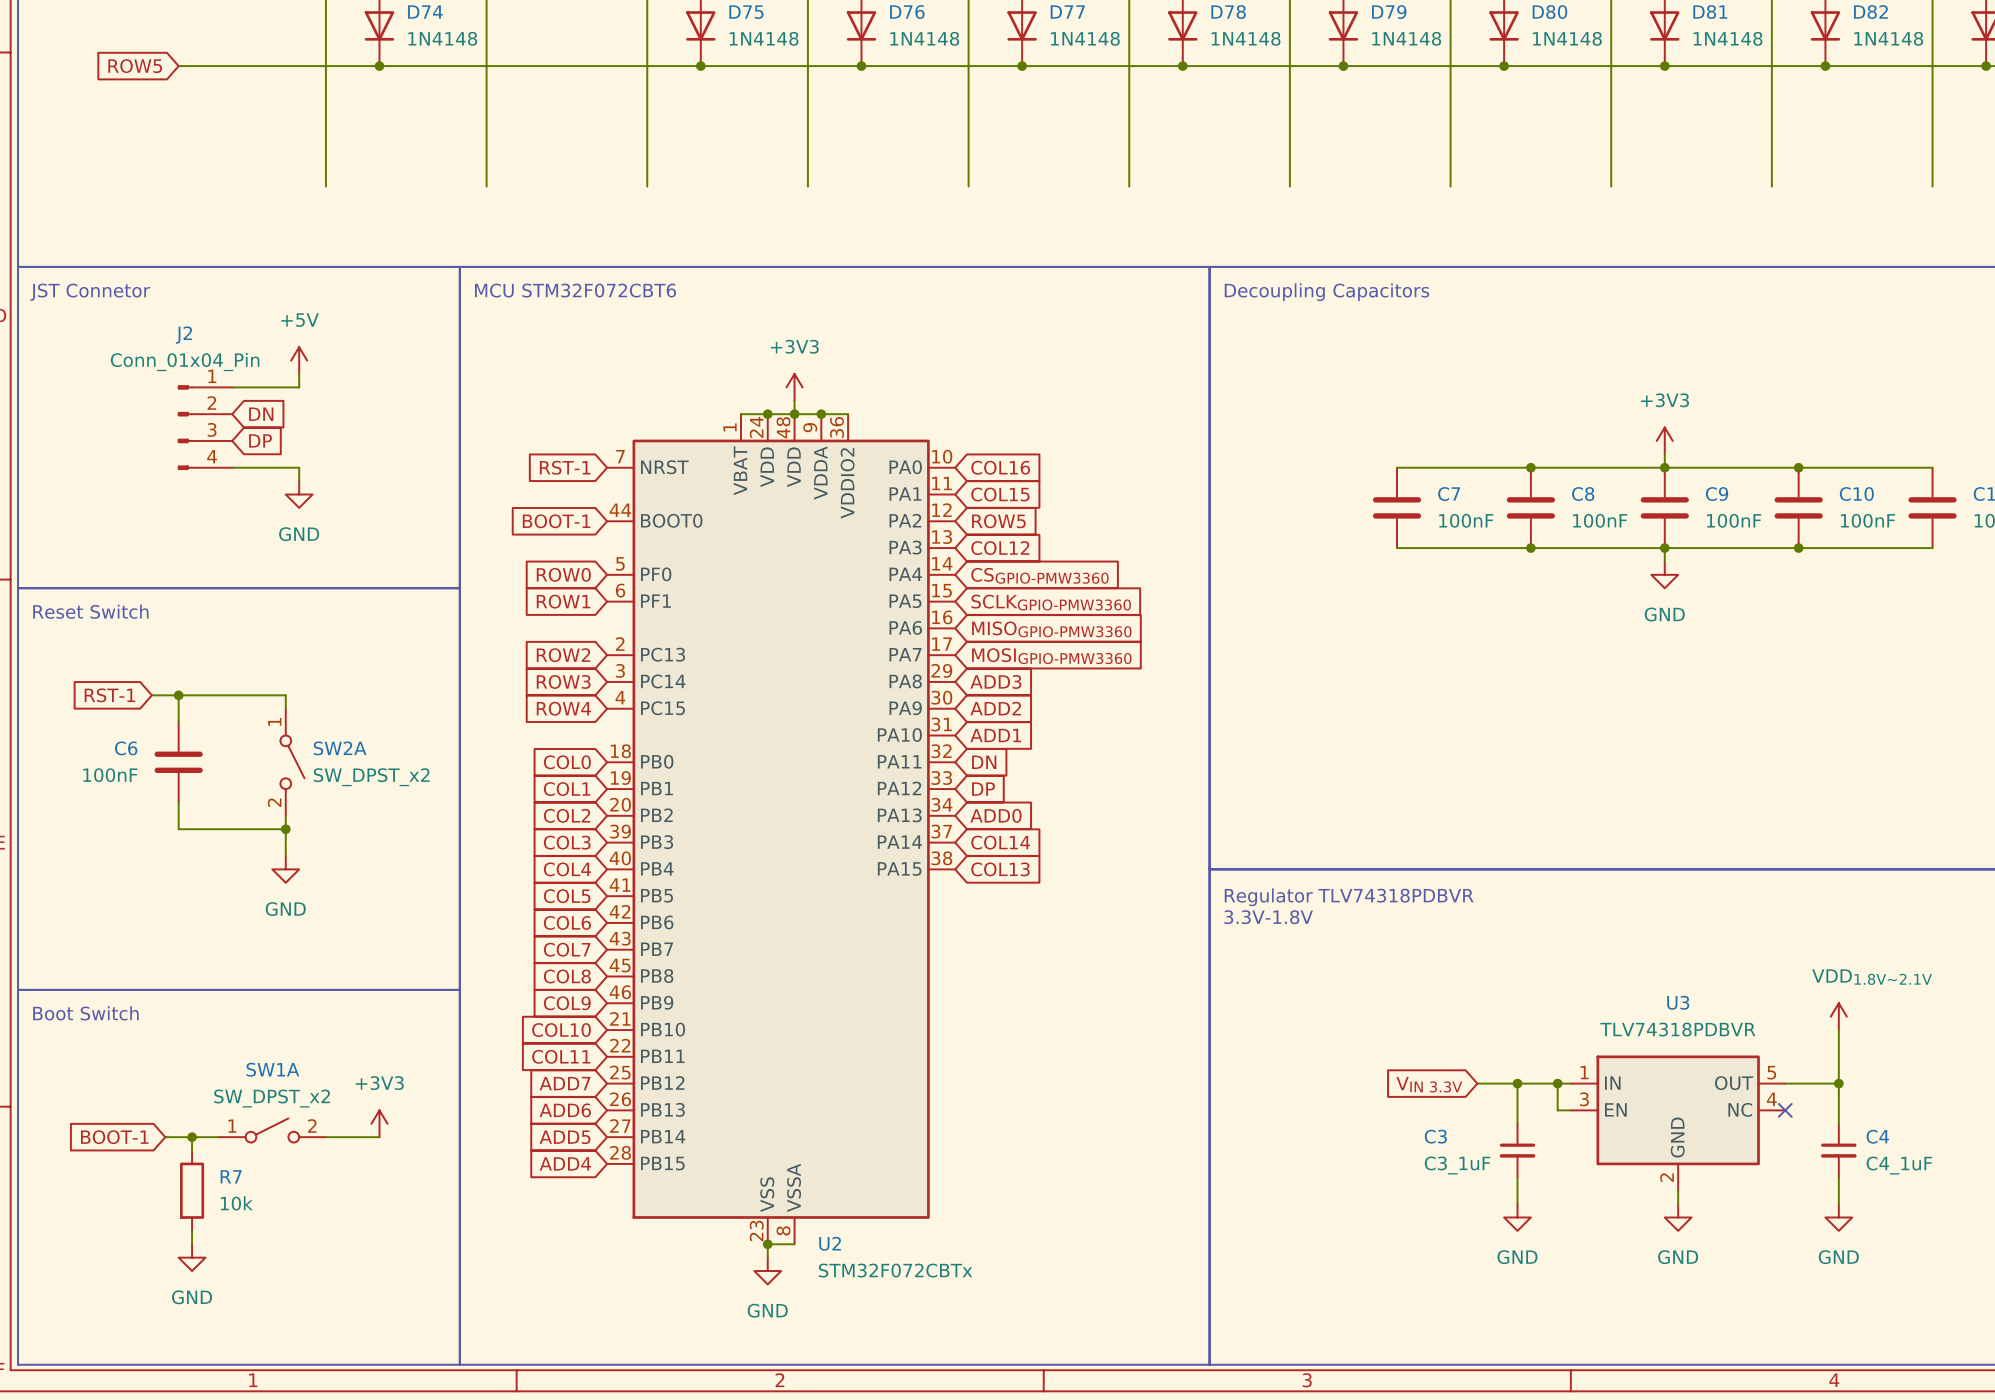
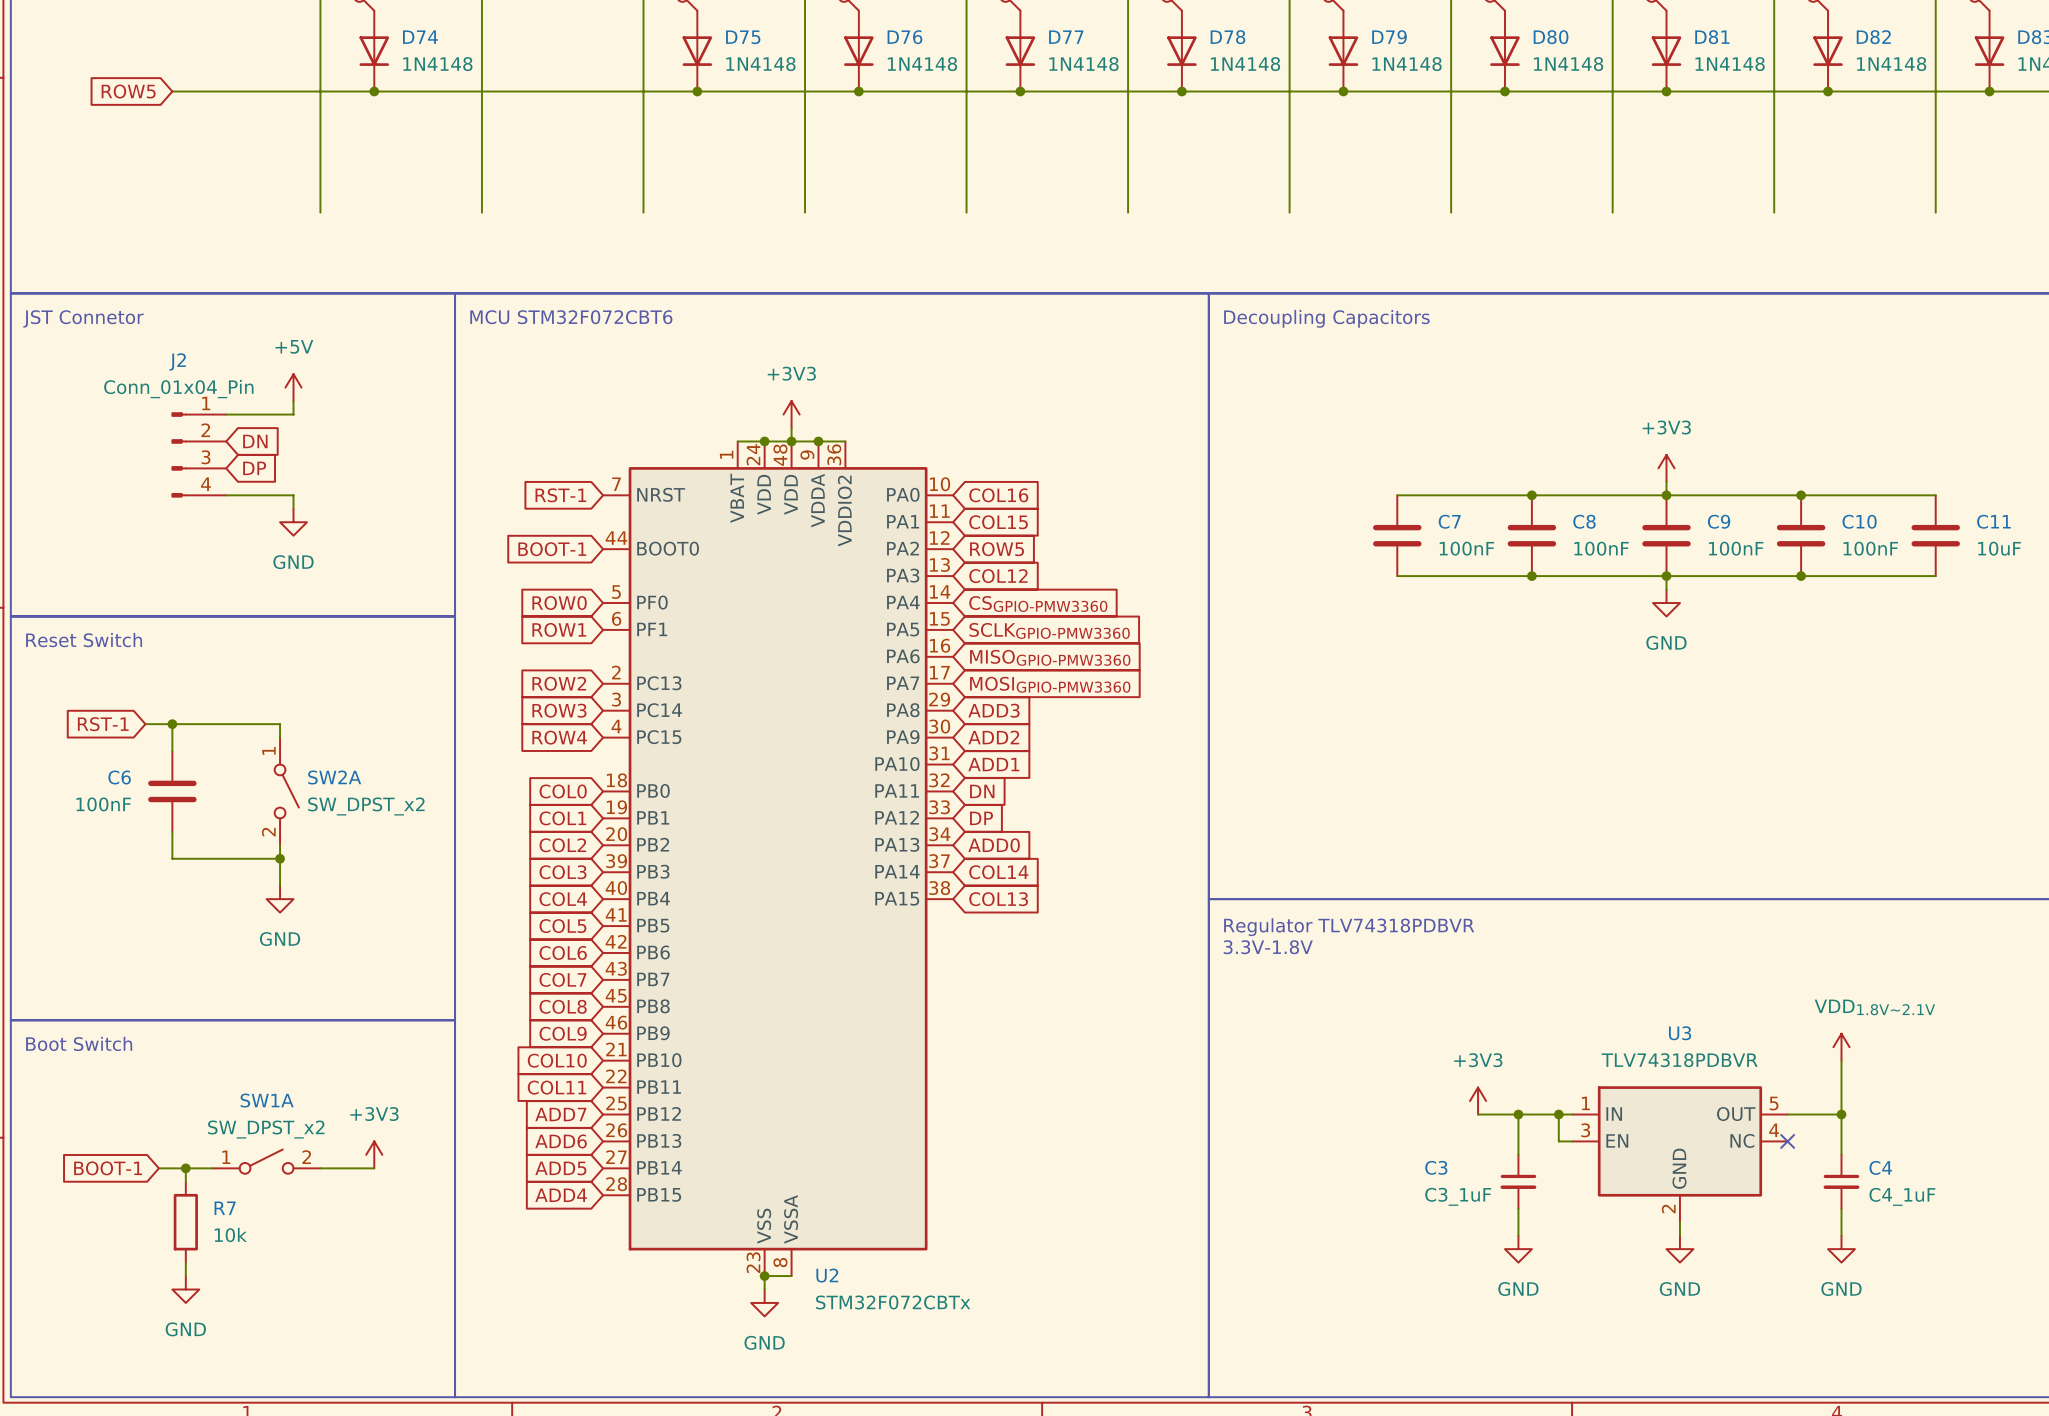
power symbol: none -> +3V3 (1478, 1101)
global label: VIN 3.3V (1429, 1084) -> none

